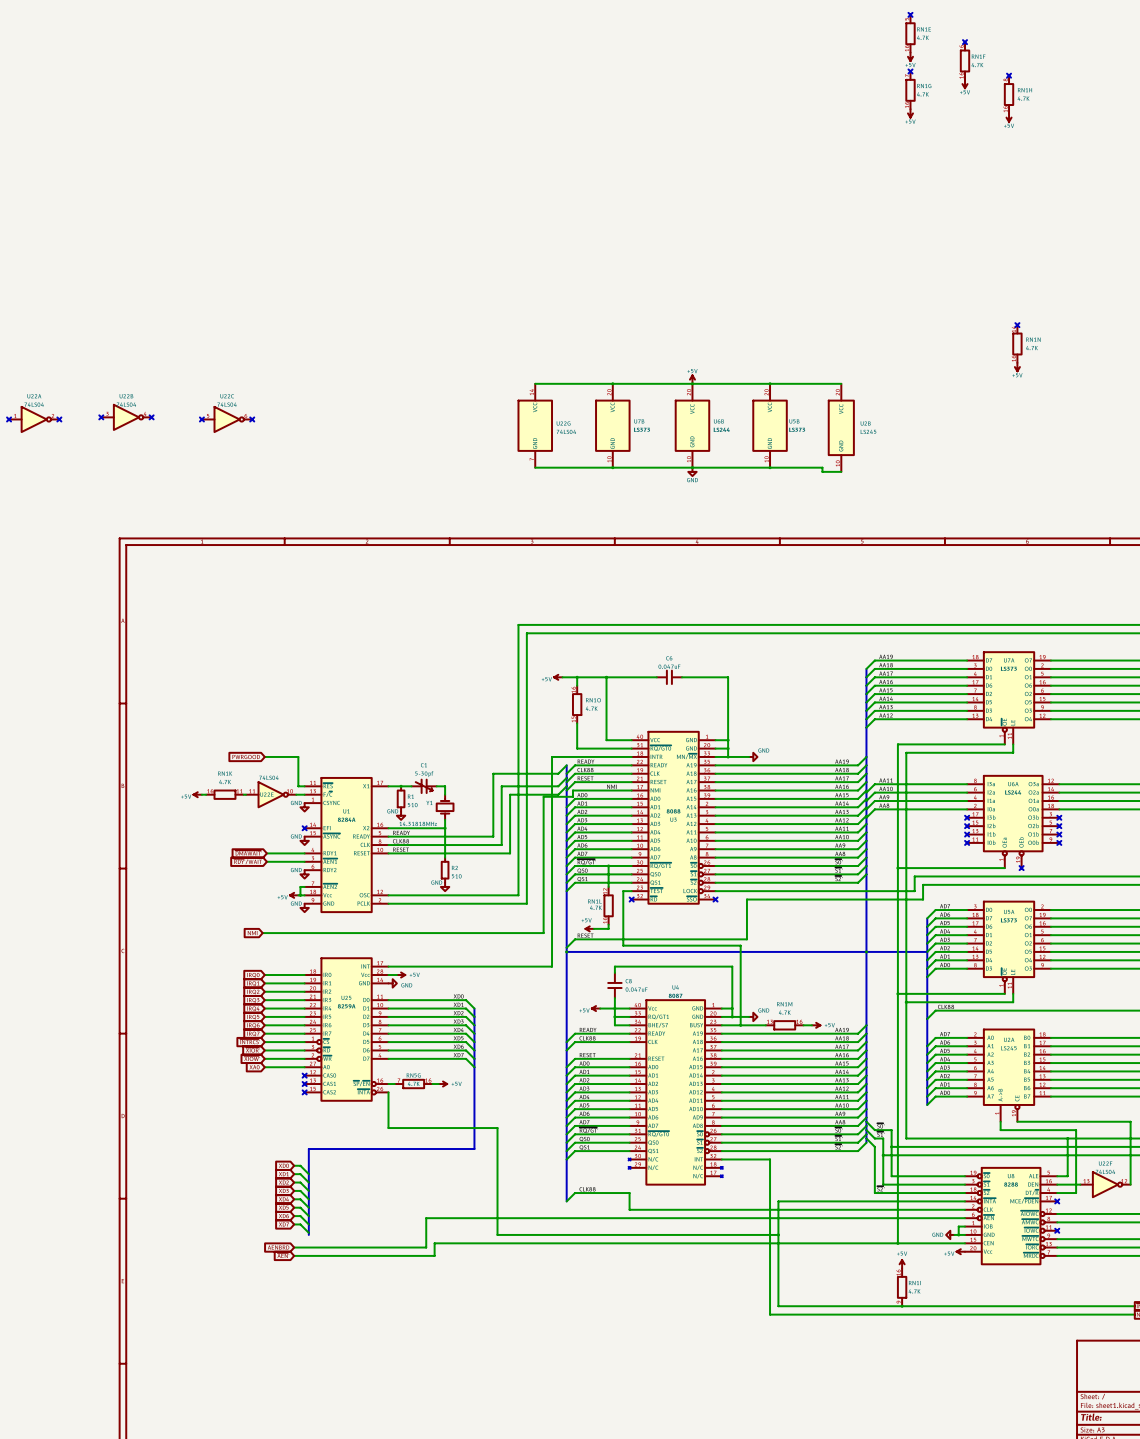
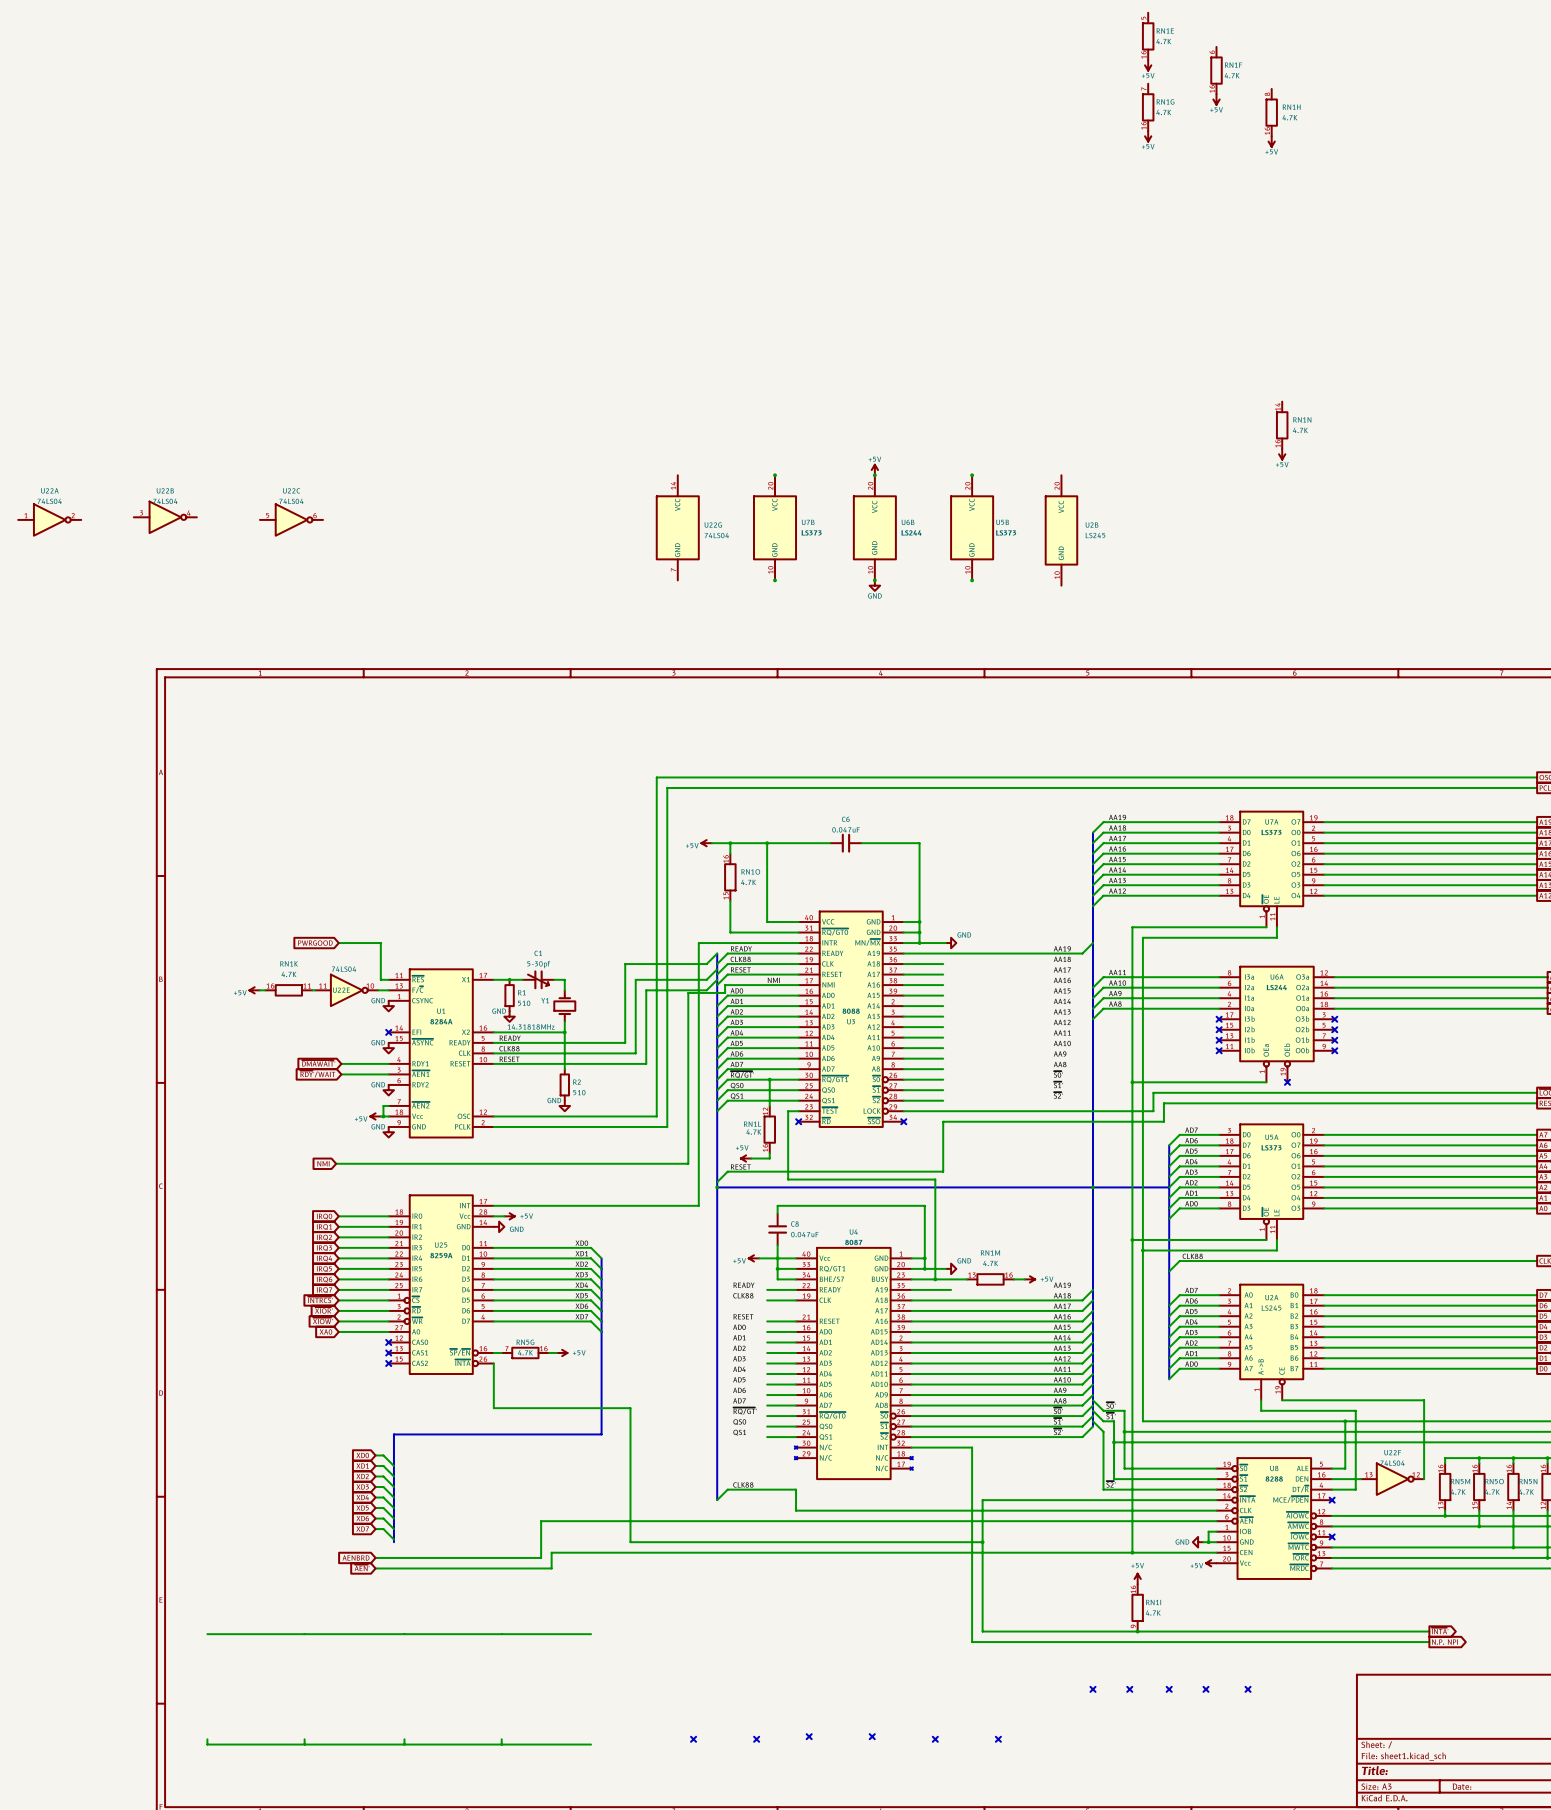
no-connect mark: (910, 14) -> none
no-connect mark: (965, 42) -> none
no-connect mark: (910, 71) -> none
no-connect mark: (1009, 75) -> none
no-connect mark: (1017, 325) -> none
wire: (535, 383) (841, 383) -> none
no-connect mark: (101, 417) -> none
no-connect mark: (151, 417) -> none
no-connect mark: (9, 419) -> none
no-connect mark: (59, 419) -> none
no-connect mark: (201, 419) -> none
no-connect mark: (252, 419) -> none
wire: (535, 467) (822, 467) (822, 471) (841, 471) -> none
wire: (866, 765) (858, 773) (746, 773) -> none
wire: (866, 773) (858, 782) (746, 782) -> none
wire: (866, 782) (858, 790) (746, 790) -> none
wire: (866, 790) (858, 798) (746, 798) -> none
wire: (866, 798) (858, 807) (746, 807) -> none
wire: (866, 807) (858, 815) (746, 815) -> none
wire: (866, 815) (858, 824) (746, 824) -> none
wire: (866, 824) (858, 832) (746, 832) -> none
wire: (866, 832) (858, 840) (746, 840) -> none
wire: (866, 840) (858, 849) (746, 849) -> none
wire: (866, 849) (858, 857) (746, 857) -> none
wire: (866, 857) (858, 865) (746, 865) -> none
wire: (866, 865) (858, 874) (746, 874) -> none
wire: (866, 874) (858, 882) (746, 882) -> none
wire: (866, 1025) (858, 1033) (753, 1033) -> none
wire: (575, 1033) (566, 1042) -> none
wire: (575, 1033) (606, 1033) -> none
wire: (575, 1042) (566, 1050) -> none
wire: (575, 1042) (606, 1042) -> none
wire: (575, 1058) (566, 1067) -> none
wire: (575, 1058) (606, 1058) -> none
wire: (575, 1067) (566, 1075) -> none
wire: (575, 1067) (606, 1067) -> none
wire: (575, 1075) (566, 1084) -> none
wire: (575, 1075) (606, 1075) -> none
wire: (575, 1084) (566, 1092) -> none
wire: (575, 1084) (606, 1084) -> none
wire: (575, 1092) (566, 1100) -> none
wire: (575, 1092) (606, 1092) -> none
wire: (575, 1100) (566, 1109) -> none
wire: (575, 1100) (606, 1100) -> none
wire: (575, 1109) (566, 1117) -> none
wire: (575, 1109) (606, 1109) -> none
wire: (575, 1117) (566, 1125) -> none
wire: (575, 1117) (606, 1117) -> none
wire: (575, 1125) (566, 1134) -> none
wire: (575, 1125) (606, 1125) -> none
wire: (575, 1134) (566, 1142) -> none
wire: (575, 1134) (606, 1134) -> none
wire: (575, 1142) (566, 1151) -> none
wire: (575, 1142) (606, 1142) -> none
wire: (575, 1151) (566, 1159) -> none
wire: (575, 1151) (606, 1151) -> none
wire: none -> (207, 1634) (591, 1634)
no-connect mark: none -> (1092, 1689)
no-connect mark: none -> (1129, 1689)
no-connect mark: none -> (1169, 1689)
no-connect mark: none -> (1205, 1689)
no-connect mark: none -> (1248, 1689)
no-connect mark: none -> (809, 1736)
no-connect mark: none -> (872, 1736)
wire: none -> (207, 1739) (207, 1744) (591, 1744)
wire: none -> (304, 1739) (304, 1744)
wire: none -> (404, 1739) (404, 1744)
wire: none -> (501, 1739) (501, 1744)
no-connect mark: none -> (693, 1739)
no-connect mark: none -> (756, 1739)
no-connect mark: none -> (935, 1739)
no-connect mark: none -> (998, 1739)

